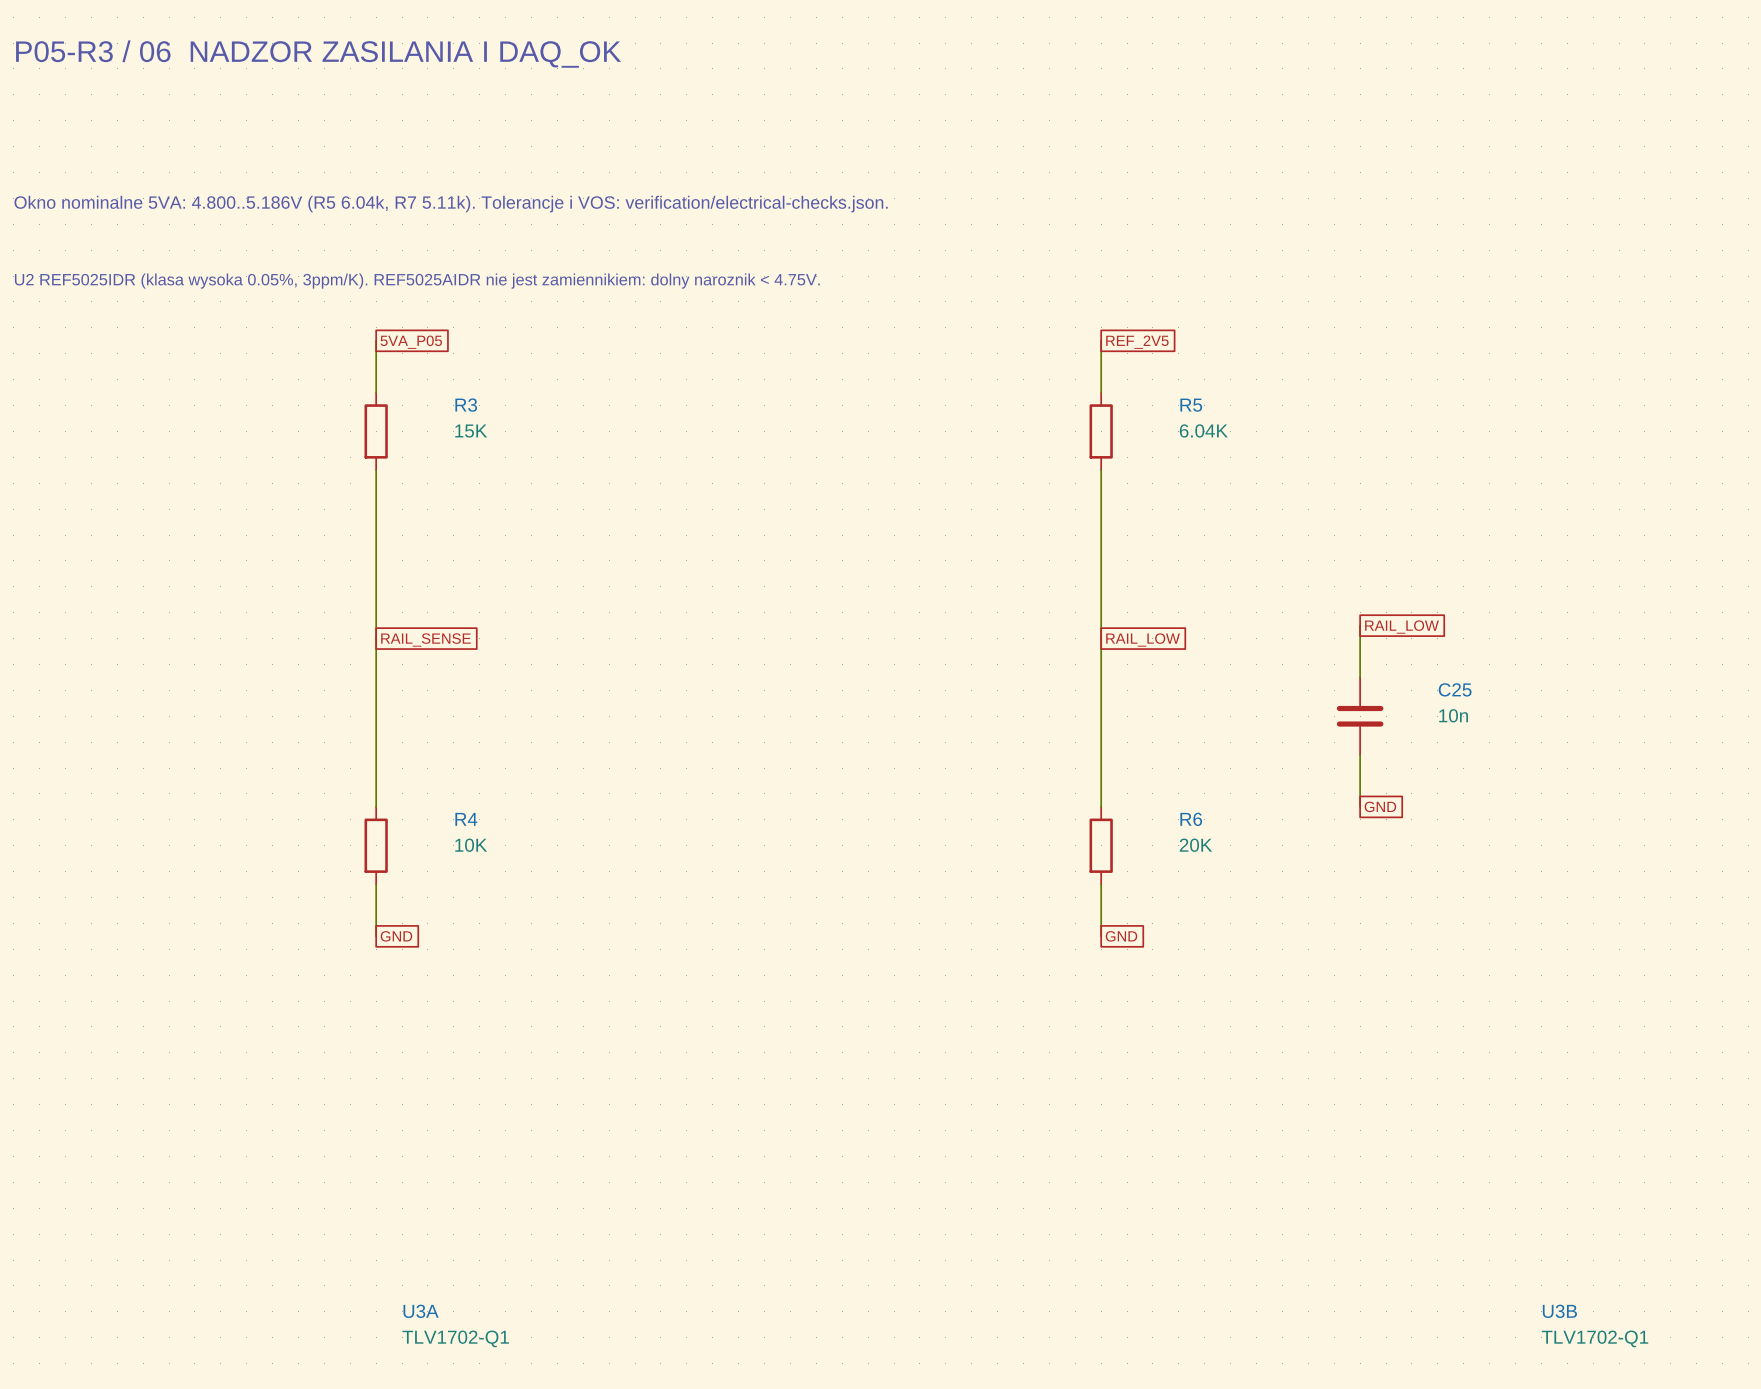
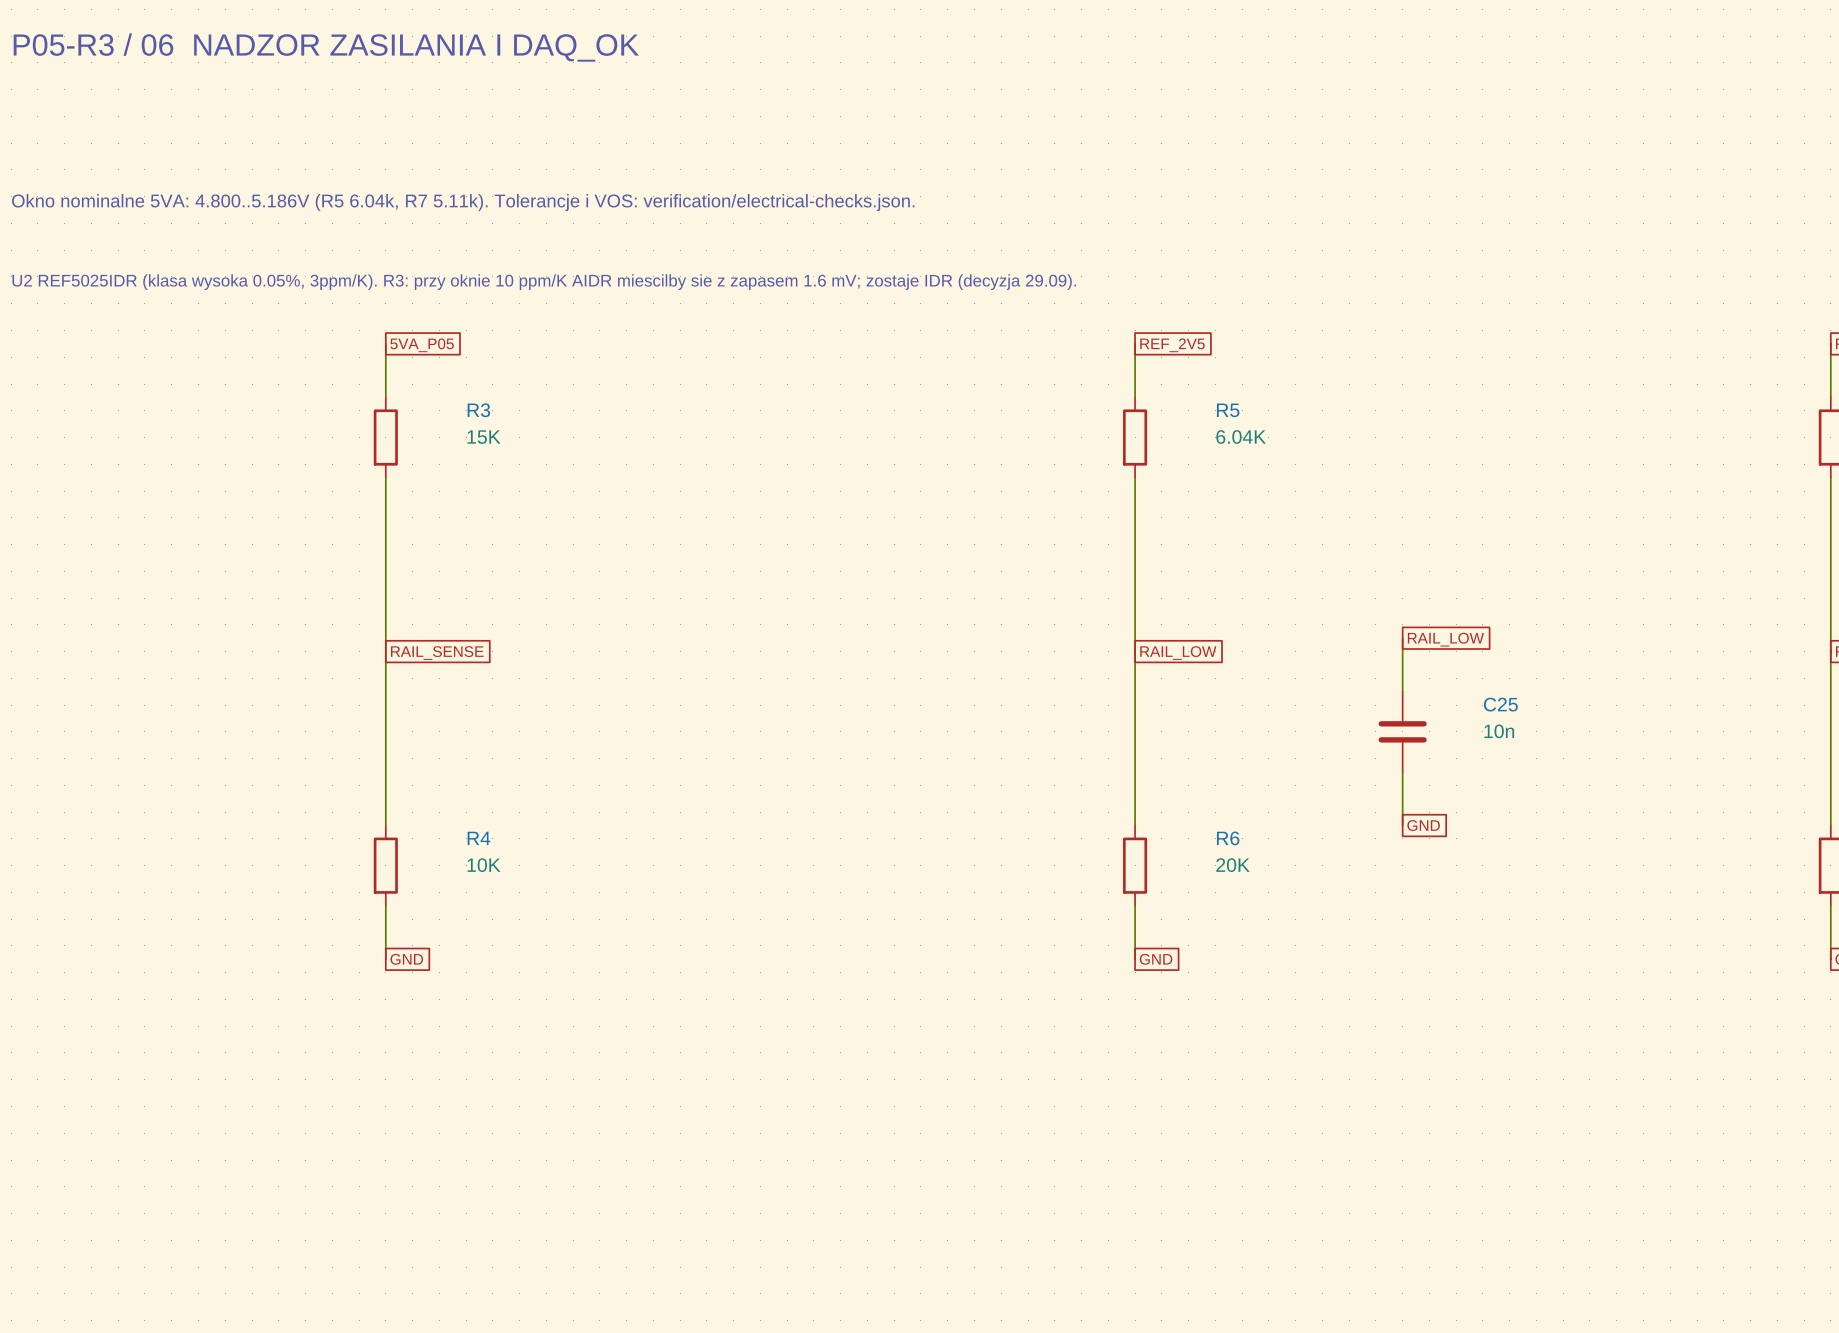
text: U2 REF5025IDR (klasa wysoka 0.05%, 3ppm/K). REF5025AIDR nie jest zamiennikiem: dolny naroznik < 4.75V. (417, 281) -> U2 REF5025IDR (klasa wysoka 0.05%, 3ppm/K). R3: przy oknie 10 ppm/K AIDR miescilby sie z zapasem 1.6 mV; zostaje IDR (decyzja 29.09). (544, 282)

